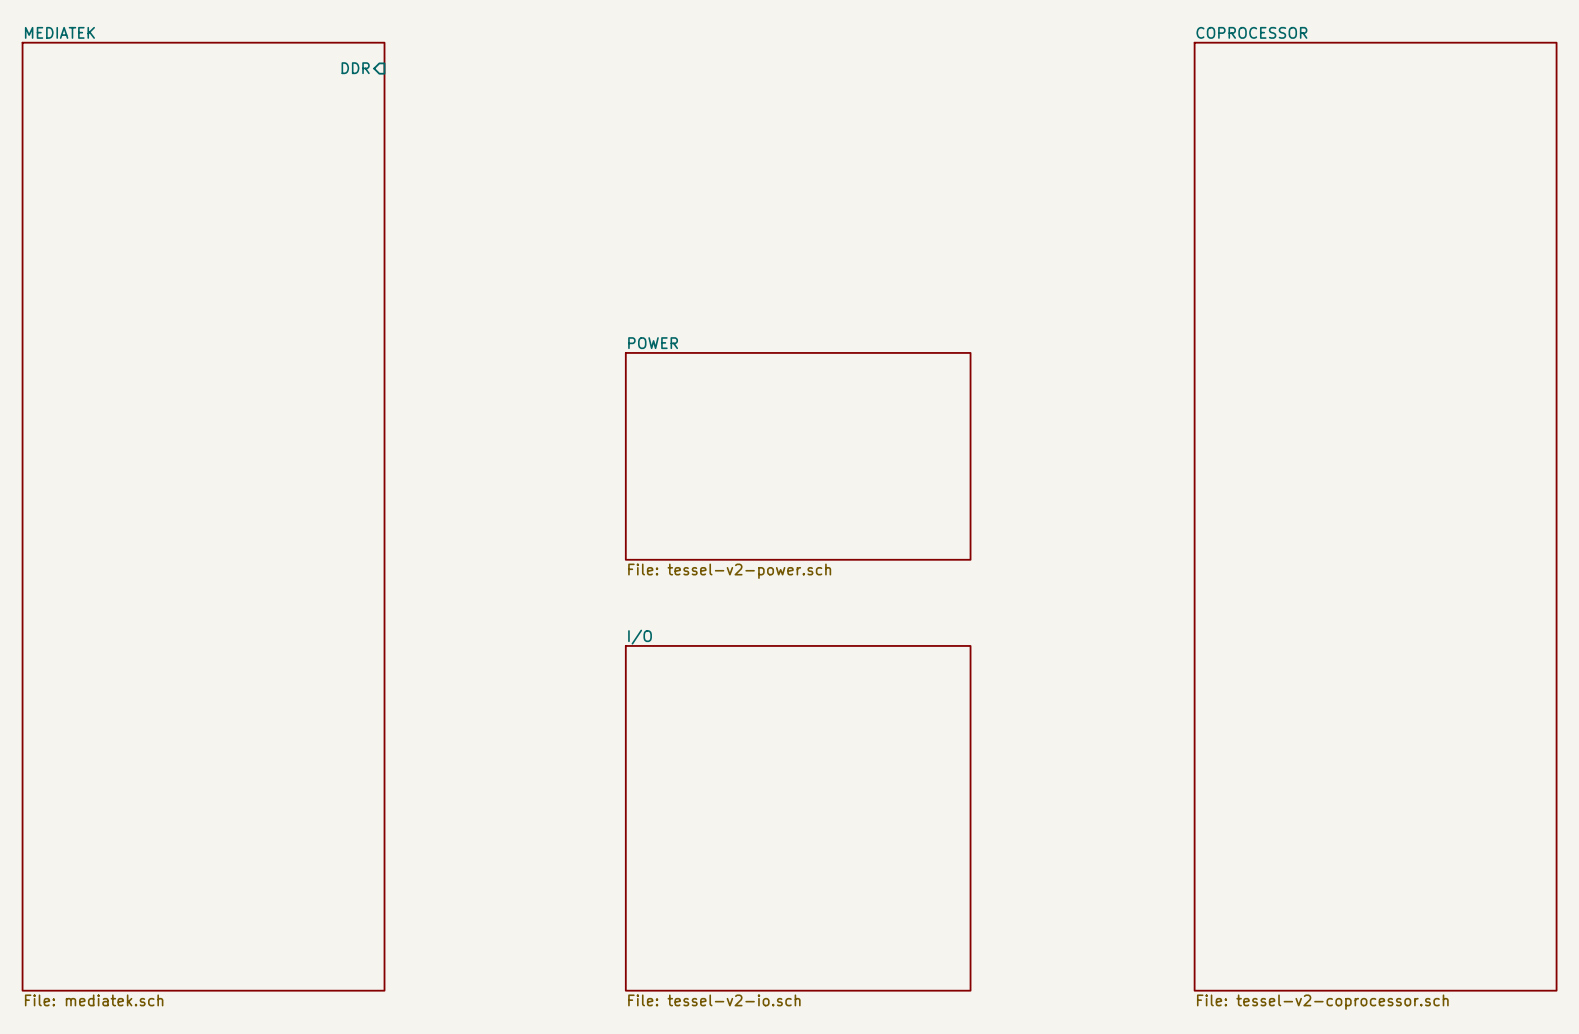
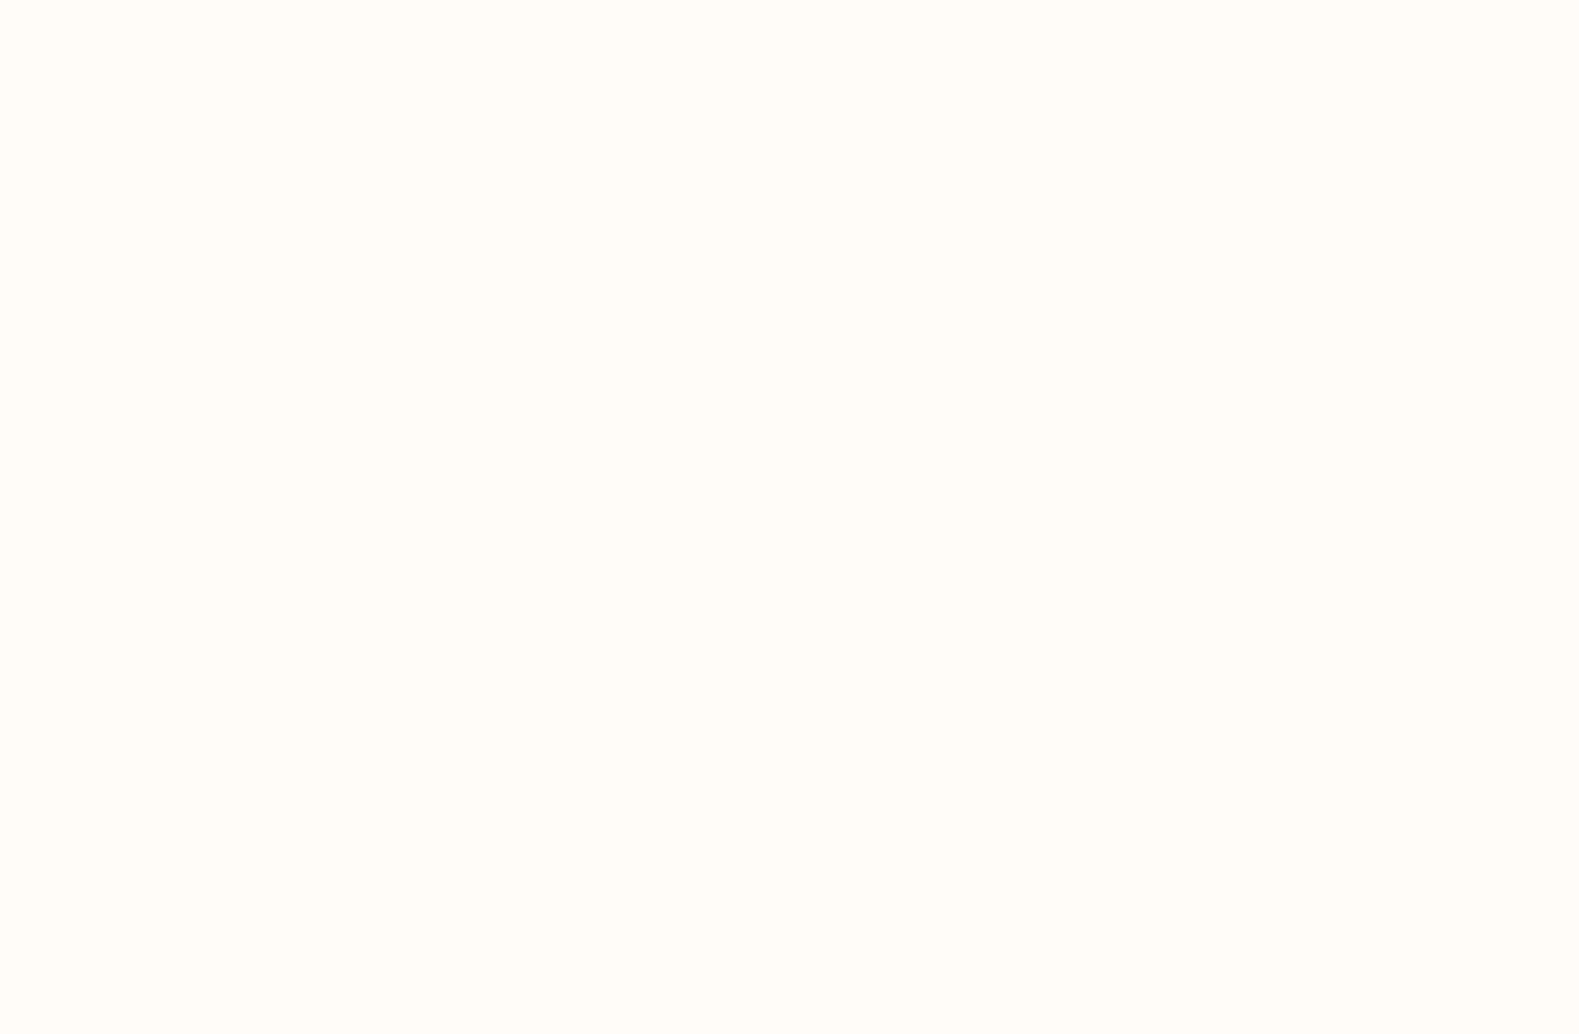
sheet pin: DDR (355, 68) -> none
sheet POWER: File: tessel-v2-power.sch (798, 456) -> none
sheet MEDIATEK: File: mediatek.sch (203, 516) -> none
sheet COPROCESSOR: File: tessel-v2-coprocessor.sch (1375, 516) -> none
sheet I/O: File: tessel-v2-io.sch (798, 818) -> none

